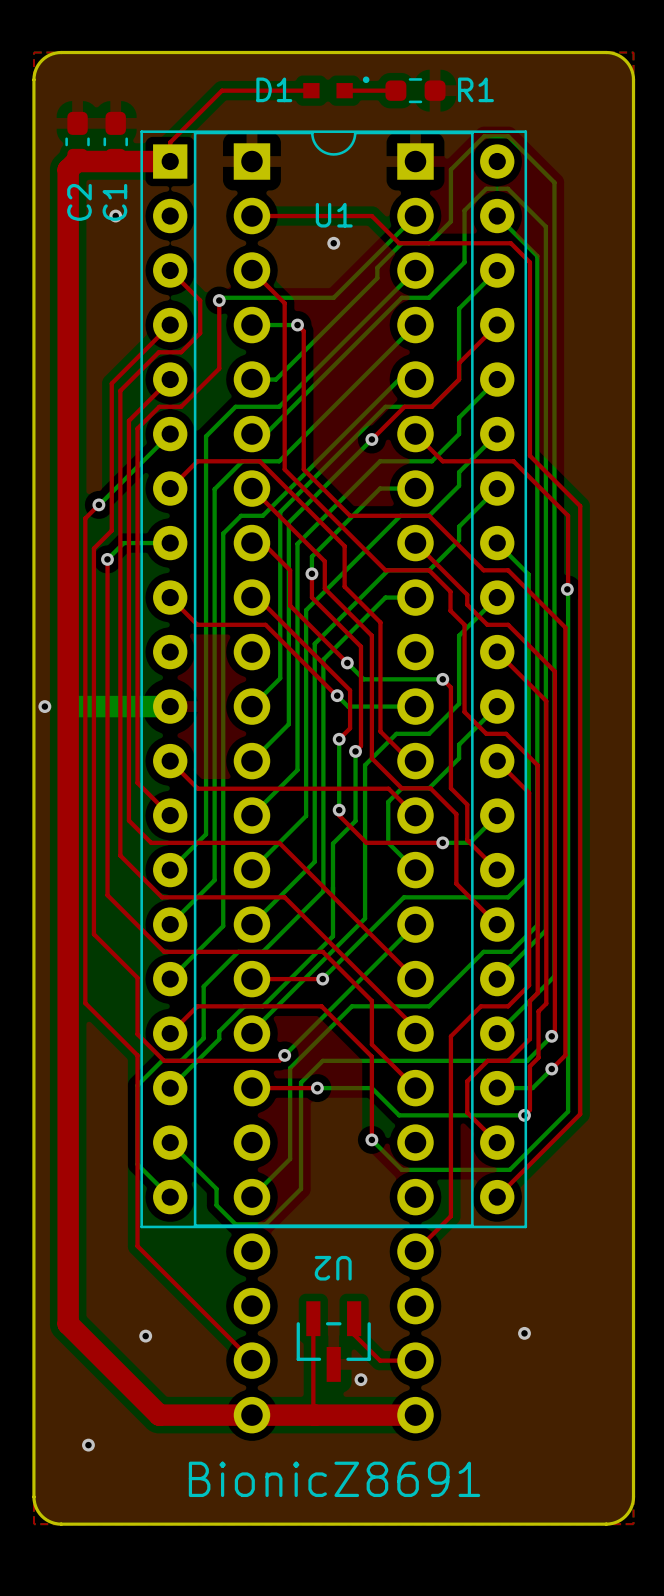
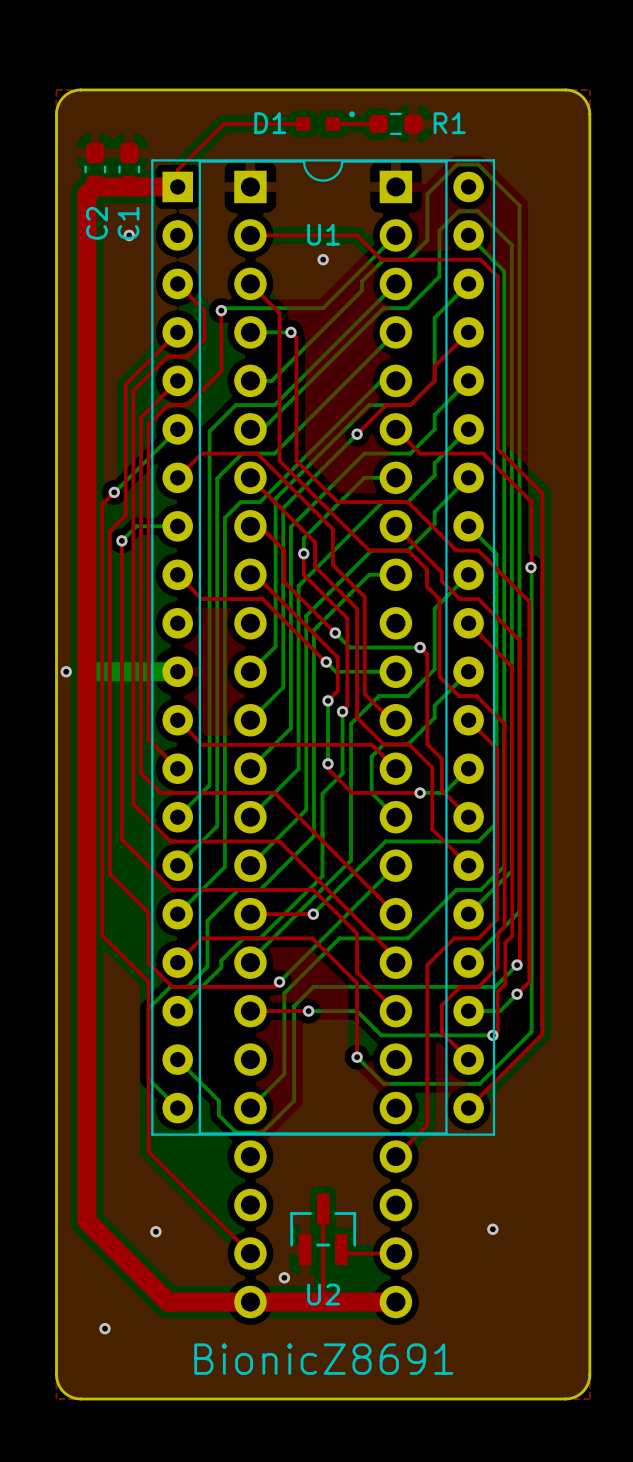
top track: none -> (323, 1208) (323, 1302)
top track: (313, 1318) (314, 1415) -> none
top track: (354, 1318) (354, 1334) (380, 1360) -> (345, 1253) (364, 1253)
U2 rotation: 0° (333, 1341) -> 180° (323, 1229)
via position: (360, 1379) -> (284, 1277)

